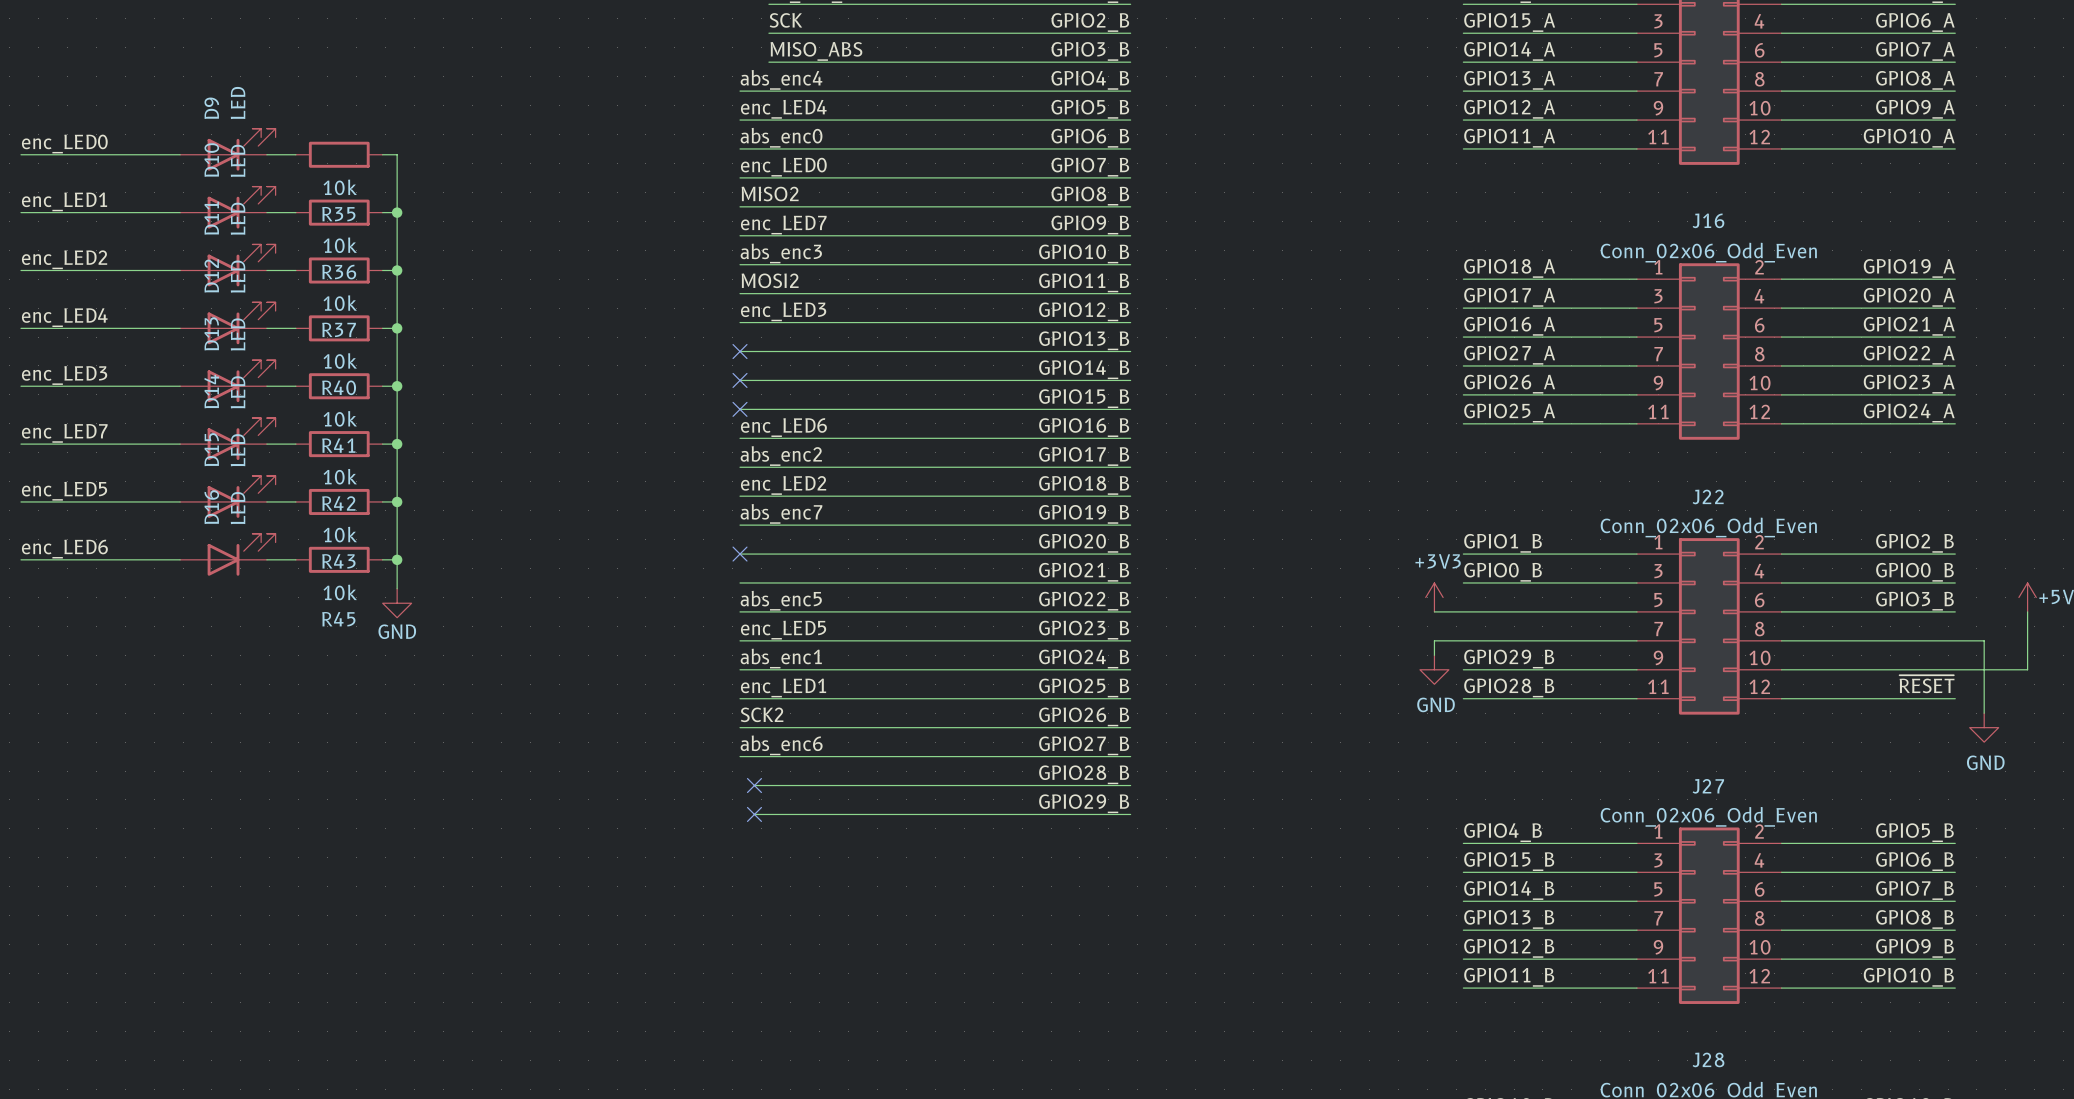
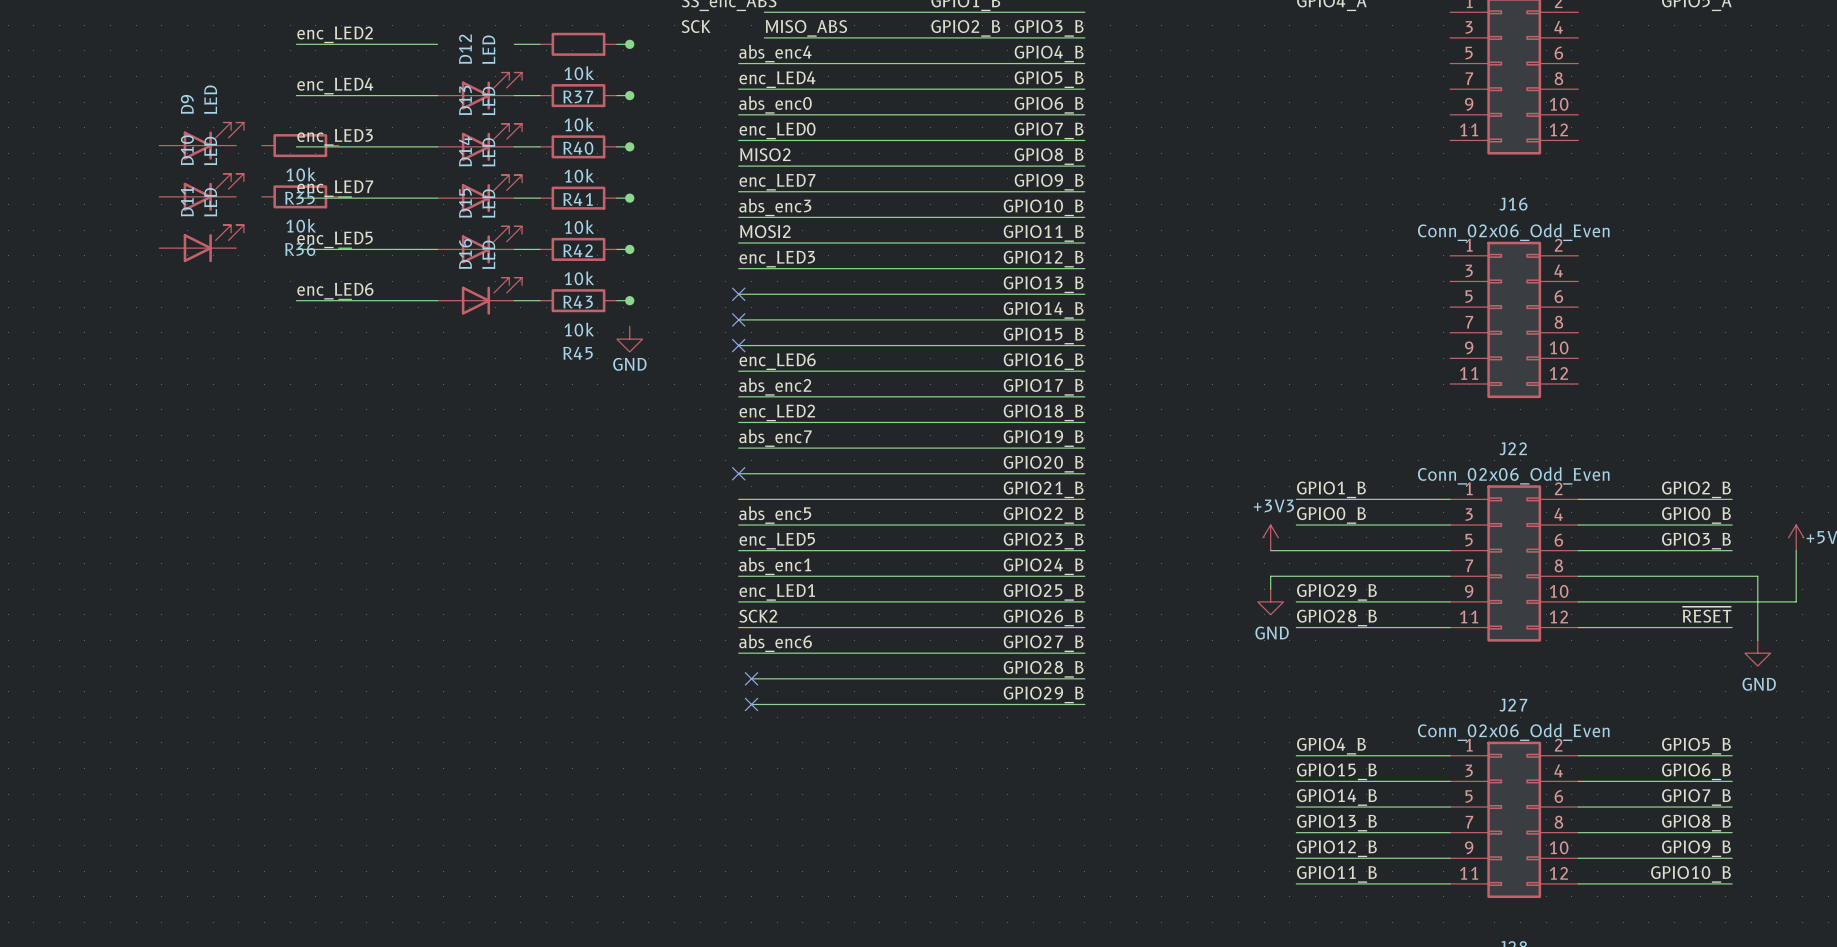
wire: (768, 4) (862, 4) -> none
wire: none -> (1001, 12) (1084, 12)
wire: (1463, 4) (1636, 4) -> none
wire: (1781, 4) (1955, 4) -> none
label: GPIO15_A (1509, 22) -> none
label: GPIO6_A (1915, 22) -> none
label: none -> enc_LED2 (335, 34)
wire: (768, 33) (862, 33) -> none
wire: none -> (1001, 37) (1084, 37)
wire: (1463, 33) (1636, 33) -> none
wire: (1781, 33) (1955, 33) -> none
wire: none -> (296, 44) (437, 44)
wire: none -> (514, 44) (540, 44)
wire: none -> (616, 44) (629, 44)
junction: none -> (629, 44)
label position: MISO_ABS (816, 51) -> MISO_ABS (806, 28)
label position: GPIO3_B (1090, 51) -> GPIO3_B (1049, 28)
label: GPIO14_A (1509, 51) -> none
label: GPIO7_A (1915, 51) -> none
wire: (768, 62) (834, 62) -> none
wire: none -> (1001, 63) (1084, 63)
wire: (1463, 62) (1636, 62) -> none
wire: (1781, 62) (1955, 62) -> none
label position: abs_enc4 (781, 79) -> abs_enc4 (775, 53)
label position: GPIO4_B (1090, 80) -> GPIO4_B (1049, 54)
label: GPIO13_A (1509, 80) -> none
label: GPIO8_A (1915, 80) -> none
label: none -> enc_LED4 (335, 86)
wire: (740, 91) (834, 91) -> none
wire: none -> (1001, 89) (1084, 89)
wire: (1463, 91) (1636, 91) -> none
wire: (1781, 91) (1955, 91) -> none
wire: none -> (296, 95) (437, 95)
wire: none -> (514, 95) (540, 95)
wire: none -> (616, 95) (629, 95)
junction: none -> (629, 95)
label position: enc_LED4 (783, 109) -> enc_LED4 (777, 79)
label position: GPIO5_B (1090, 109) -> GPIO5_B (1049, 79)
label: GPIO12_A (1509, 109) -> none
label: GPIO9_A (1915, 109) -> none
wire: (740, 120) (834, 120) -> none
wire: none -> (1001, 114) (1084, 114)
wire: (1463, 120) (1636, 120) -> none
wire: (1781, 120) (1955, 120) -> none
label position: abs_enc0 (781, 137) -> abs_enc0 (775, 104)
label position: GPIO6_B (1090, 138) -> GPIO6_B (1049, 105)
label: GPIO11_A (1509, 138) -> none
label: GPIO10_A (1909, 138) -> none
label: enc_LED0 (64, 144) -> none
label: none -> enc_LED3 (335, 137)
wire: (740, 148) (834, 148) -> none
wire: none -> (1001, 140) (1084, 140)
wire: (1463, 148) (1636, 148) -> none
wire: (1781, 148) (1955, 148) -> none
wire: (20, 154) (180, 154) -> none
wire: (266, 154) (295, 154) -> none
wire: (382, 154) (397, 154) (397, 588) -> none
wire: none -> (296, 146) (437, 146)
wire: none -> (514, 146) (540, 146)
wire: none -> (616, 146) (629, 146)
junction: none -> (629, 146)
label position: enc_LED0 (783, 167) -> enc_LED0 (777, 130)
label position: GPIO7_B (1090, 167) -> GPIO7_B (1049, 130)
wire: (740, 177) (834, 177) -> none
wire: none -> (1001, 166) (1084, 166)
label position: MISO2 (770, 194) -> MISO2 (765, 154)
label position: GPIO8_B (1090, 196) -> GPIO8_B (1049, 156)
label: enc_LED1 (64, 201) -> none
label: none -> enc_LED7 (335, 188)
wire: (740, 206) (834, 206) -> none
wire: none -> (1001, 191) (1084, 191)
wire: (20, 212) (180, 212) -> none
wire: (266, 212) (295, 212) -> none
junction: (397, 212) -> none
wire: none -> (296, 198) (437, 198)
wire: none -> (514, 198) (540, 198)
wire: none -> (616, 198) (629, 198)
junction: none -> (629, 198)
label position: enc_LED7 (783, 225) -> enc_LED7 (777, 182)
label position: GPIO9_B (1090, 225) -> GPIO9_B (1049, 182)
wire: (740, 235) (834, 235) -> none
wire: none -> (1001, 217) (1084, 217)
label position: abs_enc3 (781, 253) -> abs_enc3 (775, 207)
label position: GPIO10_B (1084, 253) -> GPIO10_B (1043, 207)
label: enc_LED2 (64, 259) -> none
label: none -> enc_LED5 (335, 239)
wire: (740, 264) (834, 264) -> none
wire: none -> (1001, 243) (1084, 243)
label: GPIO18_A (1509, 268) -> none
label: GPIO19_A (1909, 268) -> none
wire: (20, 270) (180, 270) -> none
wire: (266, 270) (295, 270) -> none
R37 position: (339, 270) -> (578, 44)
junction: (397, 270) -> none
wire: none -> (296, 249) (437, 249)
wire: none -> (514, 249) (540, 249)
wire: none -> (616, 249) (629, 249)
junction: none -> (629, 249)
wire: (1463, 279) (1636, 279) -> none
wire: (1781, 279) (1955, 279) -> none
label position: MOSI2 (770, 280) -> MOSI2 (765, 231)
label position: GPIO11_B (1084, 282) -> GPIO11_B (1043, 233)
wire: (740, 293) (834, 293) -> none
wire: none -> (1001, 268) (1084, 268)
label: GPIO17_A (1509, 297) -> none
label: GPIO20_A (1909, 297) -> none
wire: (1463, 308) (1636, 308) -> none
wire: (1781, 308) (1955, 308) -> none
label position: enc_LED3 (783, 311) -> enc_LED3 (777, 259)
label position: GPIO12_B (1084, 311) -> GPIO12_B (1043, 259)
label: enc_LED4 (64, 317) -> none
label: none -> enc_LED6 (335, 291)
wire: (740, 322) (834, 322) -> none
no-connect mark: none -> (738, 294)
wire: none -> (1001, 294) (1084, 294)
D12 position: (227, 323) -> (479, 91)
label: GPIO16_A (1509, 326) -> none
label: GPIO21_A (1909, 326) -> none
wire: (20, 328) (180, 328) -> none
wire: (266, 328) (295, 328) -> none
R40 position: (339, 328) -> (578, 95)
junction: (397, 328) -> none
wire: none -> (296, 300) (437, 300)
wire: none -> (514, 300) (540, 300)
wire: none -> (616, 300) (629, 300)
junction: none -> (629, 300)
wire: (1463, 337) (1636, 337) -> none
wire: (1781, 337) (1955, 337) -> none
label position: GPIO13_B (1084, 340) -> GPIO13_B (1043, 284)
wire: (740, 351) (834, 351) -> none
no-connect mark: (740, 351) -> none
no-connect mark: none -> (738, 319)
wire: none -> (1001, 319) (1084, 319)
label: GPIO27_A (1509, 355) -> none
label: GPIO22_A (1909, 355) -> none
wire: (1463, 365) (1636, 365) -> none
wire: (1781, 365) (1955, 365) -> none
label position: GPIO14_B (1084, 369) -> GPIO14_B (1043, 310)
power symbol: none -> GND (629, 339)
label: enc_LED3 (64, 375) -> none
wire: (740, 380) (834, 380) -> none
no-connect mark: (740, 380) -> none
no-connect mark: none -> (738, 345)
wire: none -> (1001, 345) (1084, 345)
D13 position: (227, 381) -> (479, 142)
label: GPIO26_A (1509, 384) -> none
label: GPIO23_A (1909, 384) -> none
wire: (20, 386) (180, 386) -> none
wire: (266, 386) (295, 386) -> none
R41 position: (339, 386) -> (578, 146)
wire: (382, 386) (397, 386) -> none
junction: (397, 386) -> none
wire: (1463, 394) (1636, 394) -> none
wire: (1781, 394) (1955, 394) -> none
label position: GPIO15_B (1084, 398) -> GPIO15_B (1043, 336)
wire: (740, 409) (834, 409) -> none
no-connect mark: (740, 409) -> none
wire: none -> (1001, 371) (1084, 371)
label: GPIO25_A (1509, 413) -> none
label: GPIO24_A (1909, 413) -> none
wire: (1463, 423) (1636, 423) -> none
wire: (1781, 423) (1955, 423) -> none
label position: enc_LED6 (783, 427) -> enc_LED6 (777, 361)
label position: GPIO16_B (1084, 427) -> GPIO16_B (1043, 361)
label: enc_LED7 (64, 433) -> none
wire: (740, 438) (834, 438) -> none
wire: none -> (1001, 396) (1084, 396)
D14 position: (227, 439) -> (479, 193)
wire: (20, 444) (180, 444) -> none
wire: (266, 444) (295, 444) -> none
R42 position: (339, 444) -> (578, 198)
wire: (382, 444) (397, 444) -> none
junction: (397, 444) -> none
label position: abs_enc2 (781, 456) -> abs_enc2 (775, 386)
label position: GPIO17_B (1084, 456) -> GPIO17_B (1043, 387)
wire: (740, 467) (834, 467) -> none
wire: none -> (1001, 422) (1084, 422)
label position: enc_LED2 (783, 485) -> enc_LED2 (777, 412)
label position: GPIO18_B (1084, 485) -> GPIO18_B (1043, 412)
label: enc_LED5 (64, 491) -> none
D15 position: (227, 496) -> (479, 244)
wire: (740, 496) (834, 496) -> none
wire: none -> (1001, 448) (1084, 448)
wire: (20, 501) (180, 501) -> none
wire: (266, 501) (295, 501) -> none
R43 position: (339, 501) -> (578, 249)
wire: (382, 501) (397, 501) -> none
junction: (397, 501) -> none
label position: abs_enc7 (781, 513) -> abs_enc7 (775, 438)
label position: GPIO19_B (1084, 514) -> GPIO19_B (1043, 438)
wire: (740, 525) (834, 525) -> none
no-connect mark: none -> (738, 473)
wire: none -> (1001, 473) (1084, 473)
label position: GPIO20_B (1084, 543) -> GPIO20_B (1043, 464)
label: enc_LED6 (64, 549) -> none
D16 position: (227, 554) -> (479, 296)
wire: (740, 554) (834, 554) -> none
no-connect mark: (740, 554) -> none
wire: none -> (1001, 499) (1084, 499)
wire: (20, 559) (180, 559) -> none
wire: (266, 559) (295, 559) -> none
R45 position: (339, 559) -> (578, 300)
wire: (382, 559) (397, 559) -> none
junction: (397, 559) -> none
label position: GPIO21_B (1084, 572) -> GPIO21_B (1043, 489)
wire: (740, 582) (834, 582) -> none
wire: none -> (1001, 525) (1084, 525)
label position: abs_enc5 (781, 600) -> abs_enc5 (775, 515)
label position: GPIO22_B (1084, 601) -> GPIO22_B (1043, 515)
power symbol: GND (397, 603) -> none
wire: (740, 611) (834, 611) -> none
wire: none -> (1001, 550) (1084, 550)
label position: enc_LED5 (783, 630) -> enc_LED5 (777, 541)
label position: GPIO23_B (1084, 630) -> GPIO23_B (1043, 541)
wire: (740, 640) (834, 640) -> none
wire: none -> (1001, 576) (1084, 576)
label position: abs_enc1 (781, 658) -> abs_enc1 (775, 566)
label position: GPIO24_B (1084, 659) -> GPIO24_B (1043, 566)
wire: (740, 669) (834, 669) -> none
wire: none -> (1001, 601) (1084, 601)
label position: enc_LED1 (783, 687) -> enc_LED1 (777, 592)
label position: GPIO25_B (1084, 687) -> GPIO25_B (1043, 592)
wire: (740, 698) (834, 698) -> none
wire: none -> (1001, 627) (1084, 627)
label position: SCK2 (762, 714) -> SCK2 (758, 616)
label position: GPIO26_B (1084, 716) -> GPIO26_B (1043, 618)
wire: (740, 727) (834, 727) -> none
wire: none -> (1001, 653) (1084, 653)
label position: abs_enc6 (781, 745) -> abs_enc6 (775, 643)
label position: GPIO27_B (1084, 745) -> GPIO27_B (1043, 643)
wire: (740, 756) (848, 756) -> none
no-connect mark: none -> (751, 678)
wire: none -> (1001, 678) (1084, 678)
label position: GPIO28_B (1084, 774) -> GPIO28_B (1043, 669)
wire: (754, 785) (848, 785) -> none
no-connect mark: (754, 785) -> none
no-connect mark: none -> (751, 704)
wire: none -> (1001, 704) (1084, 704)
label position: GPIO29_B (1084, 803) -> GPIO29_B (1043, 694)
wire: (754, 814) (1130, 814) -> none
no-connect mark: (754, 814) -> none

